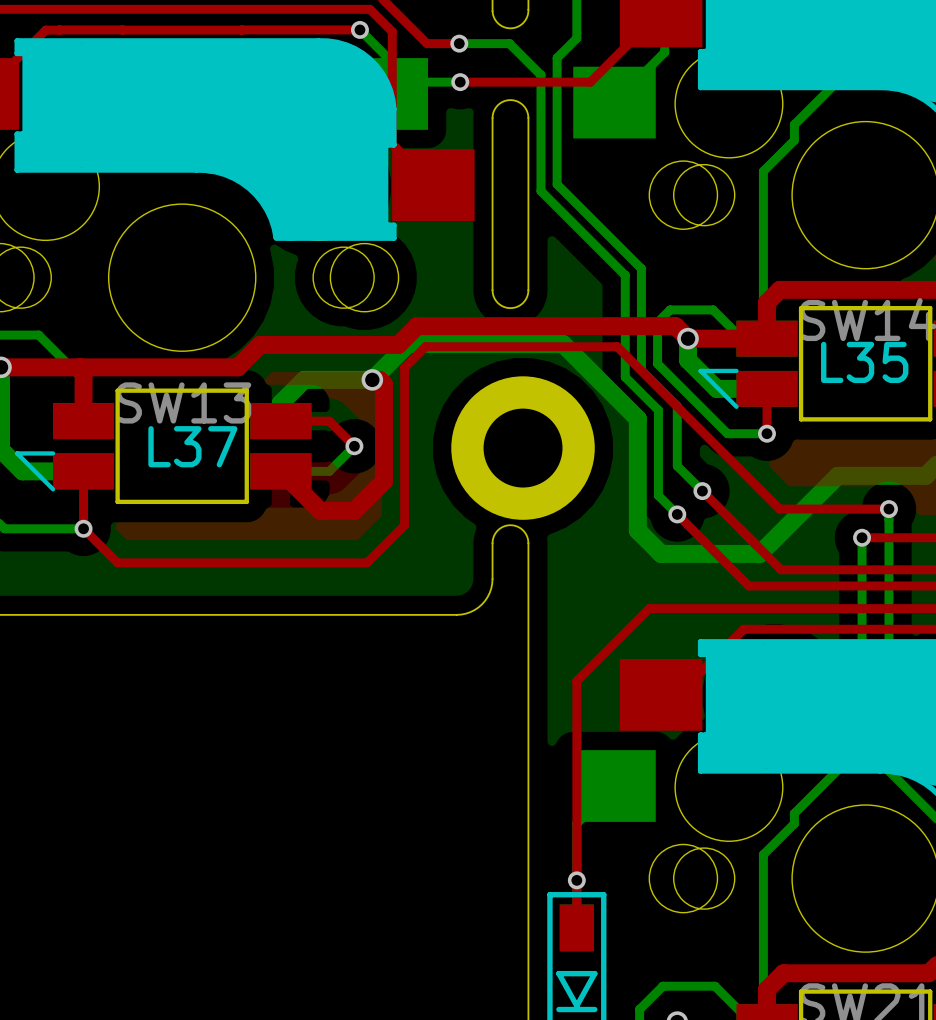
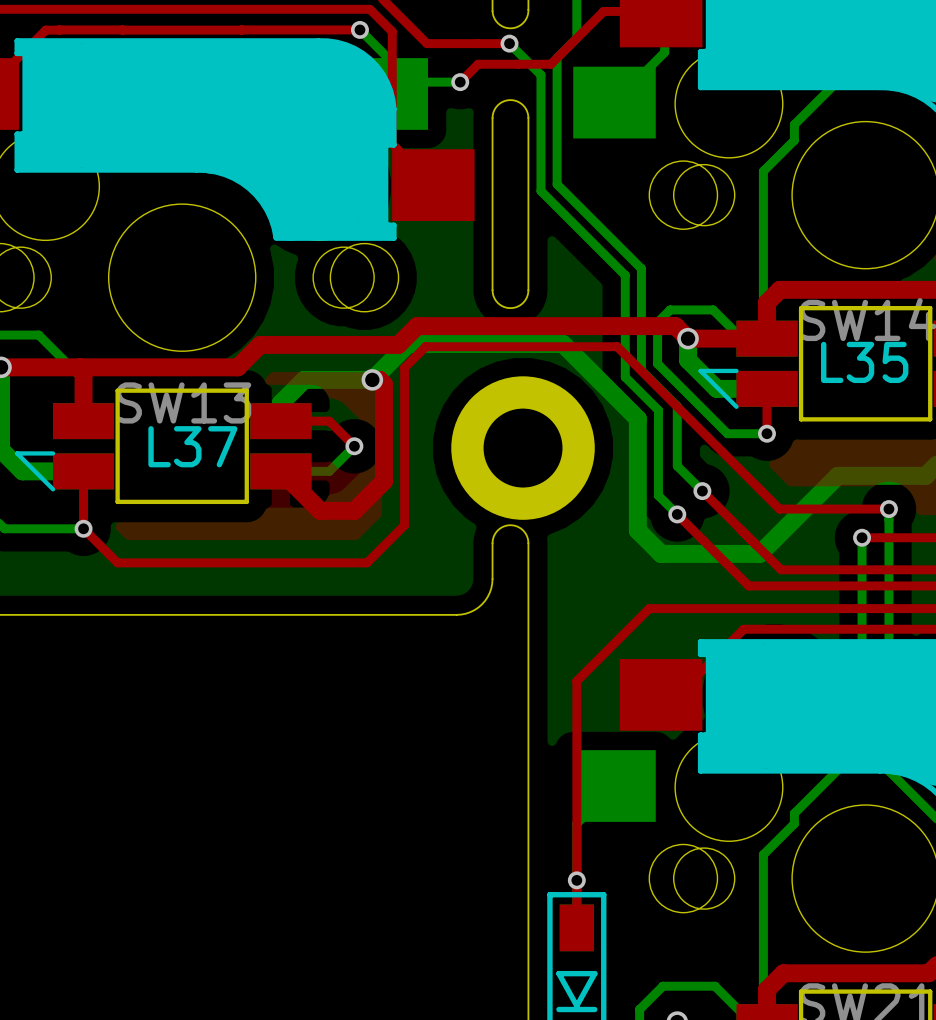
top track: (661, 11) (590, 82) (460, 82) -> (625, 11) (603, 11) (550, 64) (478, 64) (460, 82)
top track: none -> (459, 43) (509, 43)
bottom track: (459, 43) (509, 43) -> none
via position: (459, 43) -> (509, 43)

